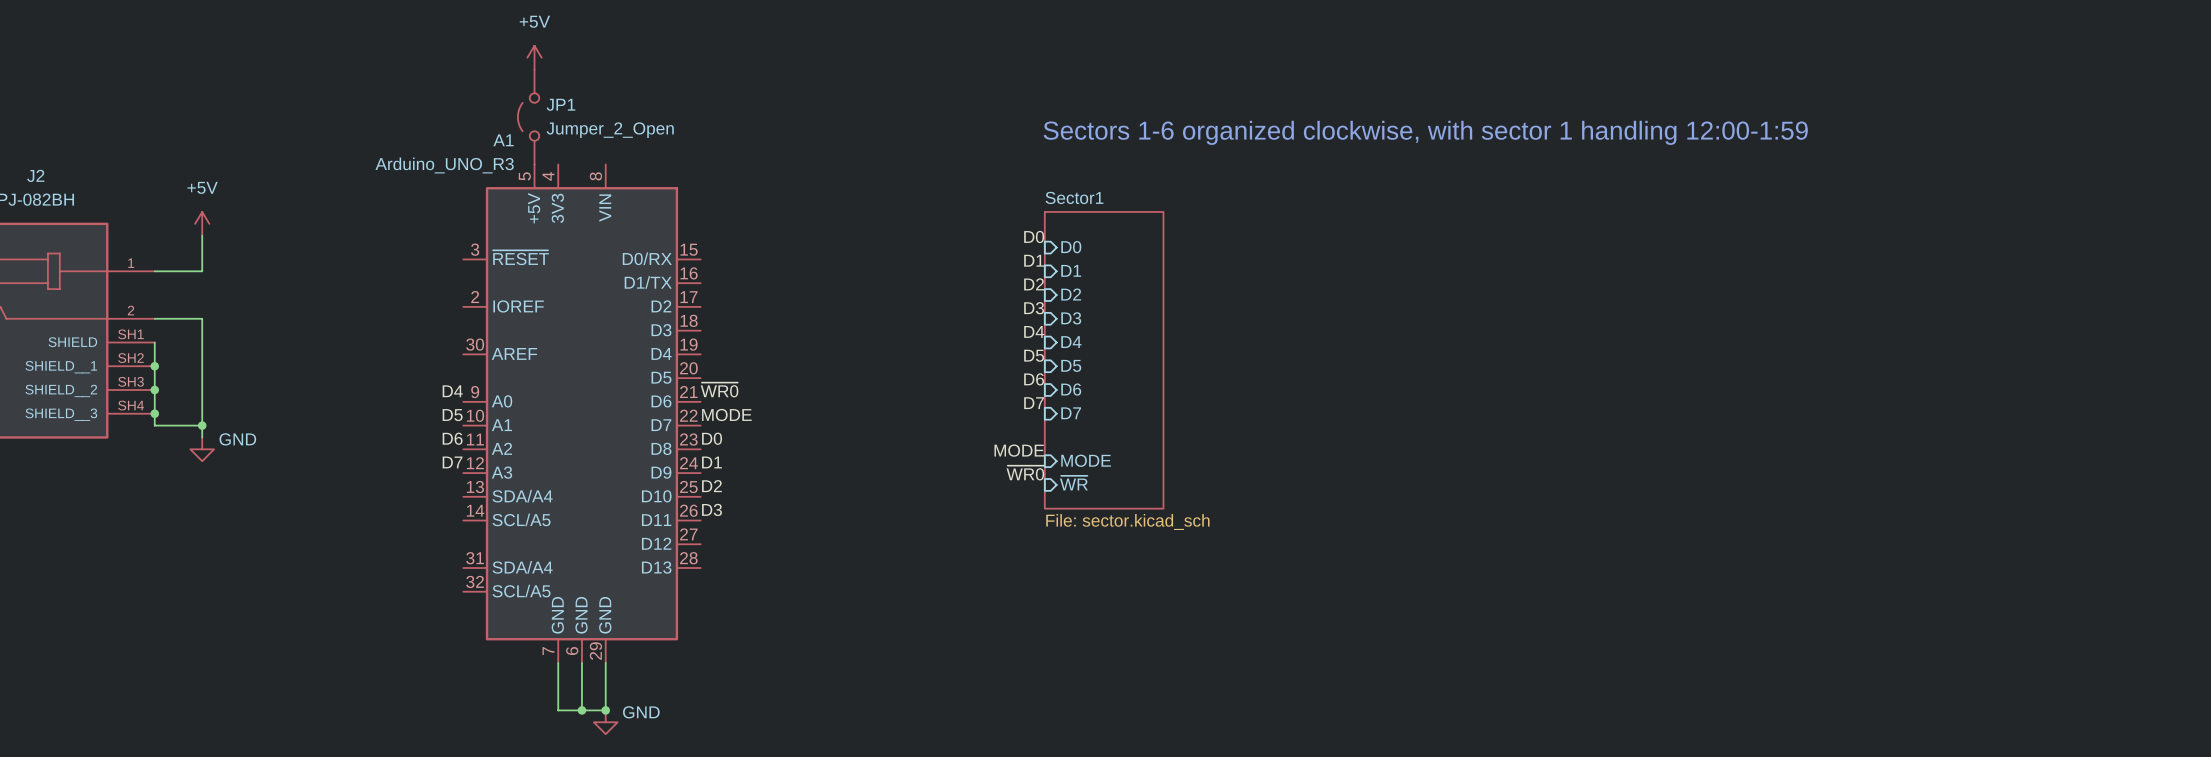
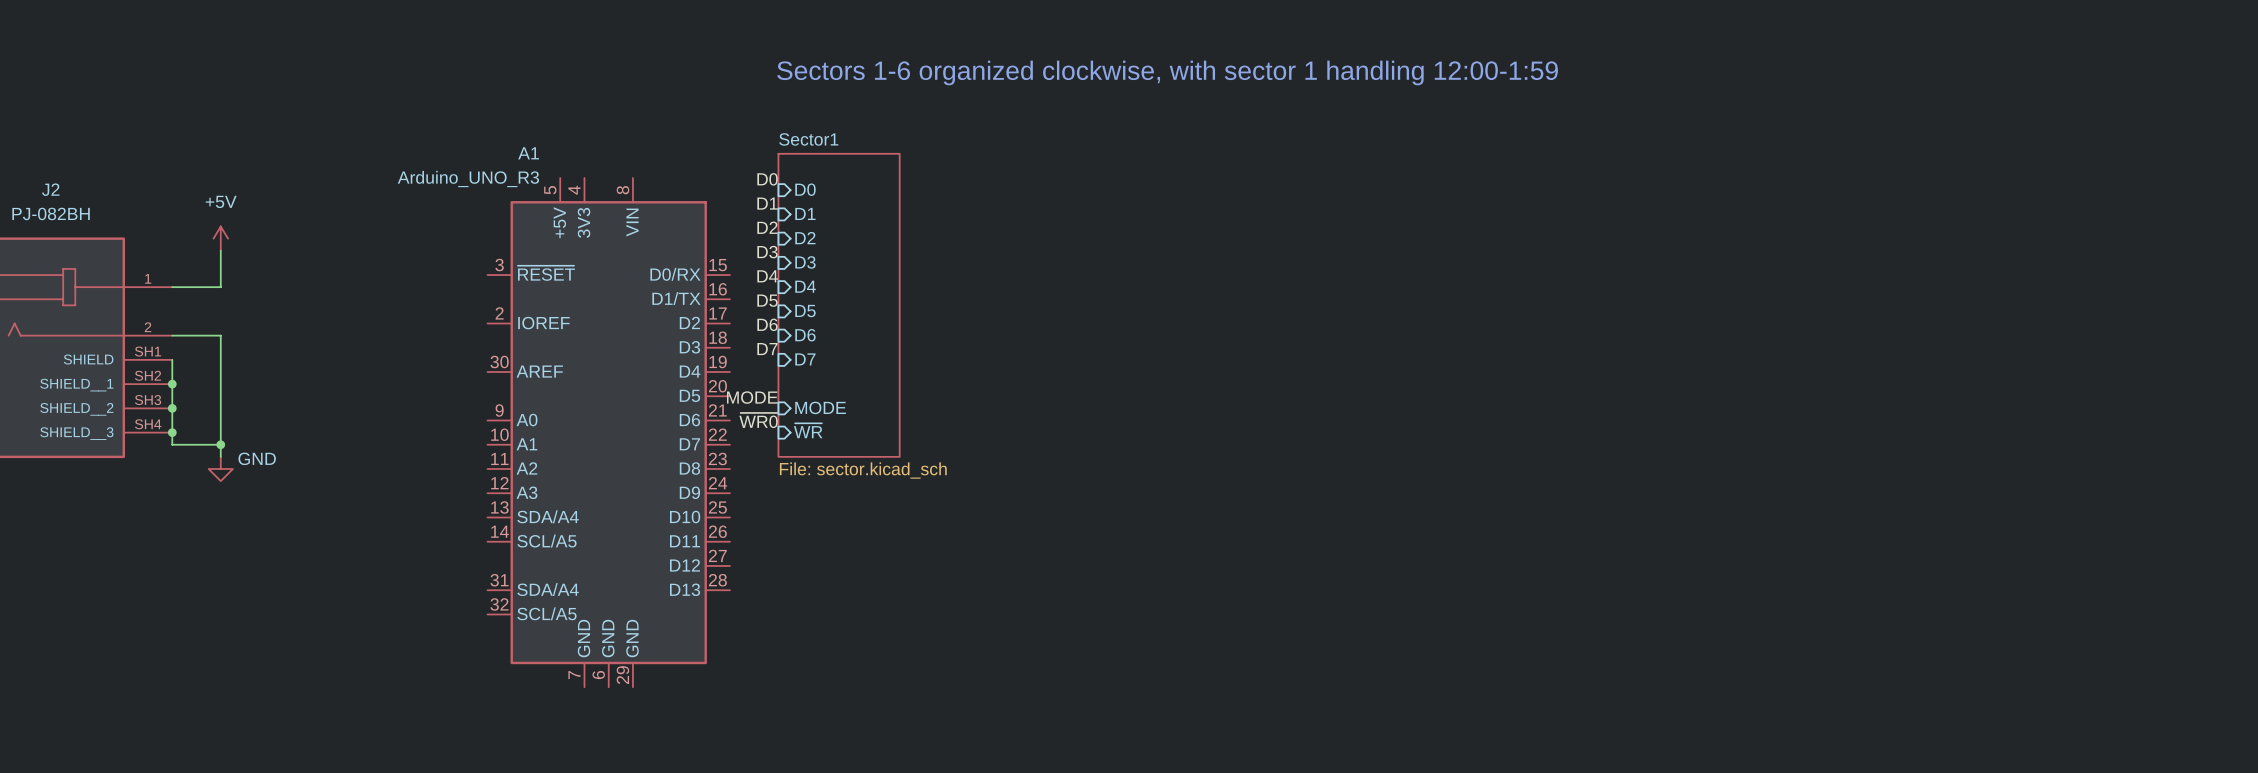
power symbol: +5V (534, 57) -> none
text: none -> Sectors 1-6 organized clockwise, with sector 1 handling 12:00-1:59 (1167, 72)
JP1: Jumper_2_Open (528, 117) -> none
text: Sectors 1-6 organized clockwise, with sector 1 handling 12:00-1:59 (1425, 132) -> none
label: none -> D0 (767, 179)
sheet pin: none -> D0 (805, 189)
label: none -> D1 (767, 203)
sheet pin: none -> D1 (805, 213)
label: none -> D2 (767, 227)
sheet pin: none -> D2 (805, 238)
label: none -> D3 (767, 252)
label: D0 (1034, 236) -> none
sheet pin: none -> D3 (805, 262)
sheet pin: D0 (1071, 247) -> none
label: none -> D4 (767, 276)
label: D1 (1034, 260) -> none
sheet pin: none -> D4 (805, 286)
sheet pin: D1 (1071, 270) -> none
label: none -> D5 (767, 300)
label: D2 (1034, 284) -> none
sheet pin: none -> D5 (805, 311)
sheet pin: D2 (1071, 294) -> none
label: none -> D6 (767, 324)
label: D3 (1034, 308) -> none
sheet pin: none -> D6 (805, 335)
sheet pin: D3 (1071, 318) -> none
label: none -> D7 (767, 349)
label: D4 (1034, 331) -> none
sheet pin: none -> D7 (805, 359)
sheet pin: D4 (1071, 342) -> none
label: D5 (1034, 355) -> none
sheet Sector1 position: (1104, 360) -> (839, 305)
sheet pin: D5 (1071, 365) -> none
label: D6 (1034, 379) -> none
label position: ~{WR0} (719, 389) -> ~{WR0} (758, 420)
sheet pin: none -> MODE (820, 407)
sheet pin: D6 (1071, 389) -> none
label: D4 (452, 391) -> none
label: D7 (1034, 403) -> none
sheet pin: none -> ~{WR} (808, 430)
sheet pin: D7 (1071, 413) -> none
label: D5 (452, 415) -> none
label position: MODE (726, 415) -> MODE (752, 397)
label: D6 (452, 438) -> none
label: D0 (712, 438) -> none
label: MODE (1019, 450) -> none
sheet pin: MODE (1086, 460) -> none
label: D7 (452, 462) -> none
label: D1 (711, 462) -> none
label: ~{WR0} (1025, 473) -> none
sheet pin: ~{WR} (1073, 483) -> none
label: D2 (711, 486) -> none
label: D3 (712, 509) -> none
wire: (558, 662) (558, 710) (605, 710) (605, 662) -> none
wire: (581, 662) (581, 710) -> none
junction: (581, 710) -> none
junction: (605, 710) -> none
power symbol: GND (605, 722) -> none

